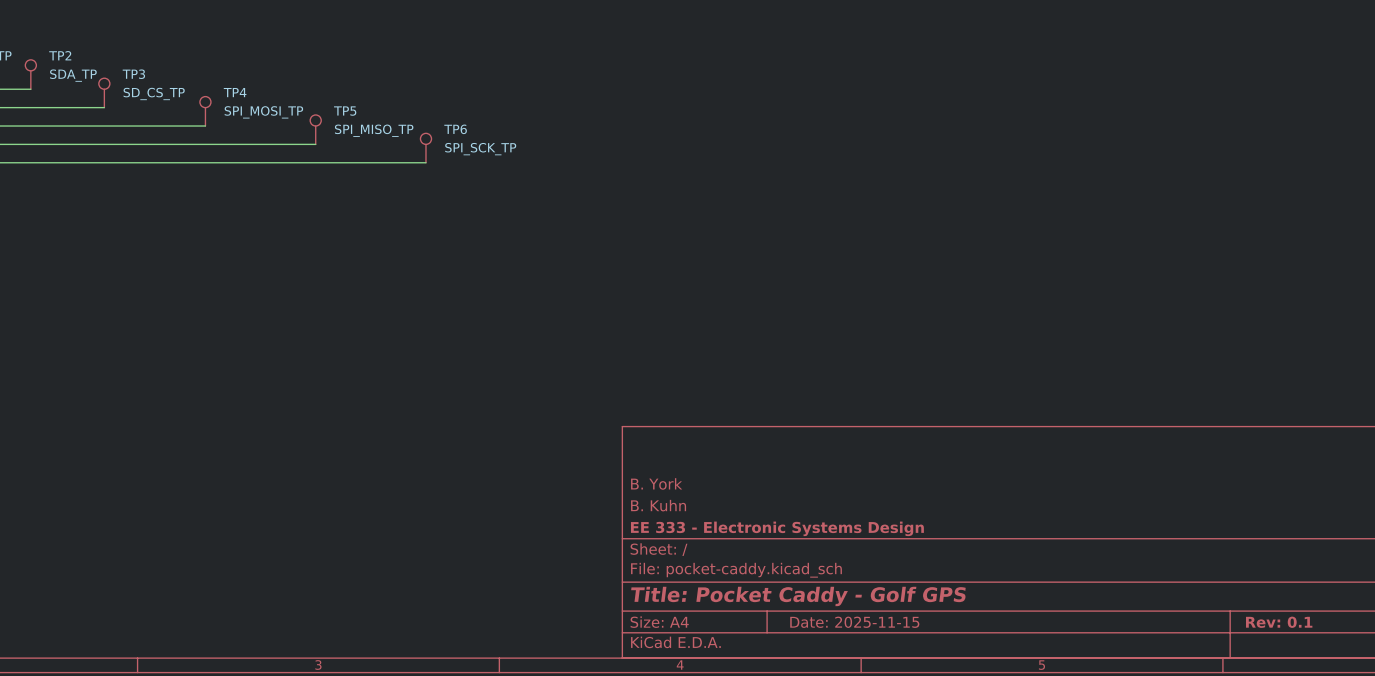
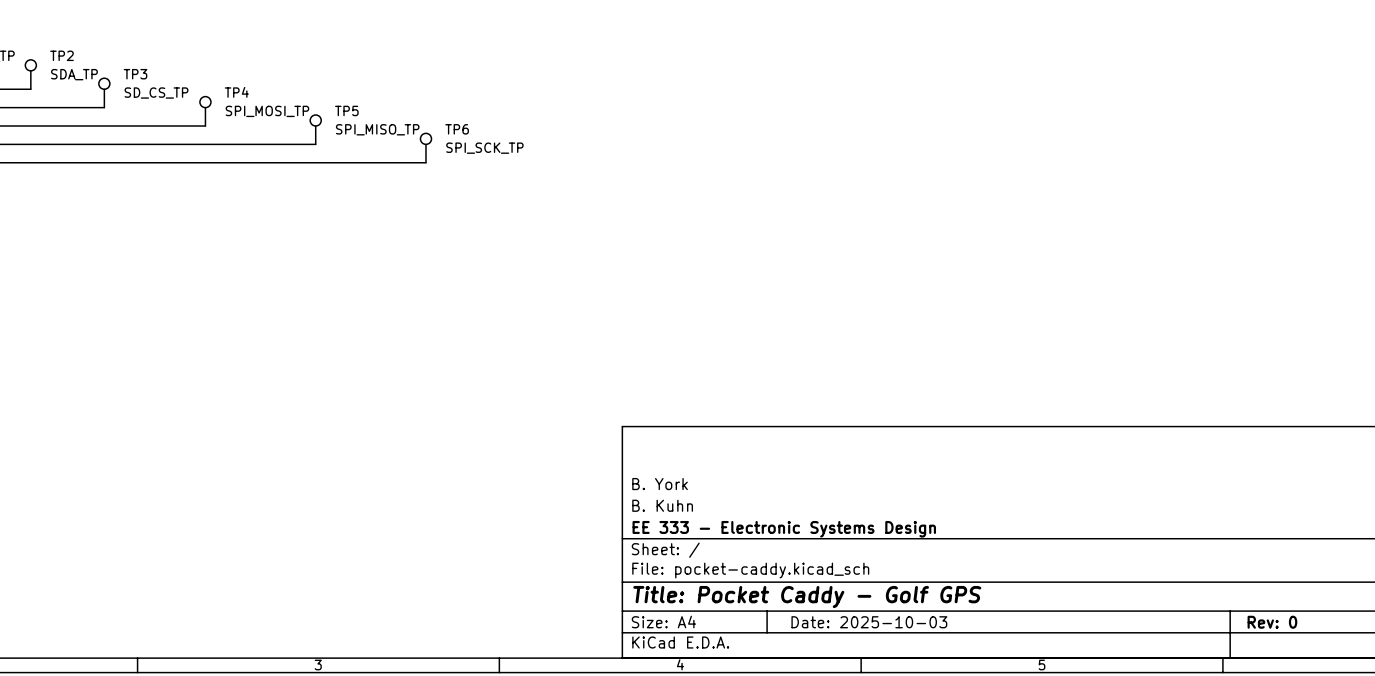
title block: Date: 2025-11-15 (854, 622) -> Date: 2025-10-03 (869, 622)
title block: Rev: 0.1 (1279, 622) -> Rev: 0 (1272, 622)

